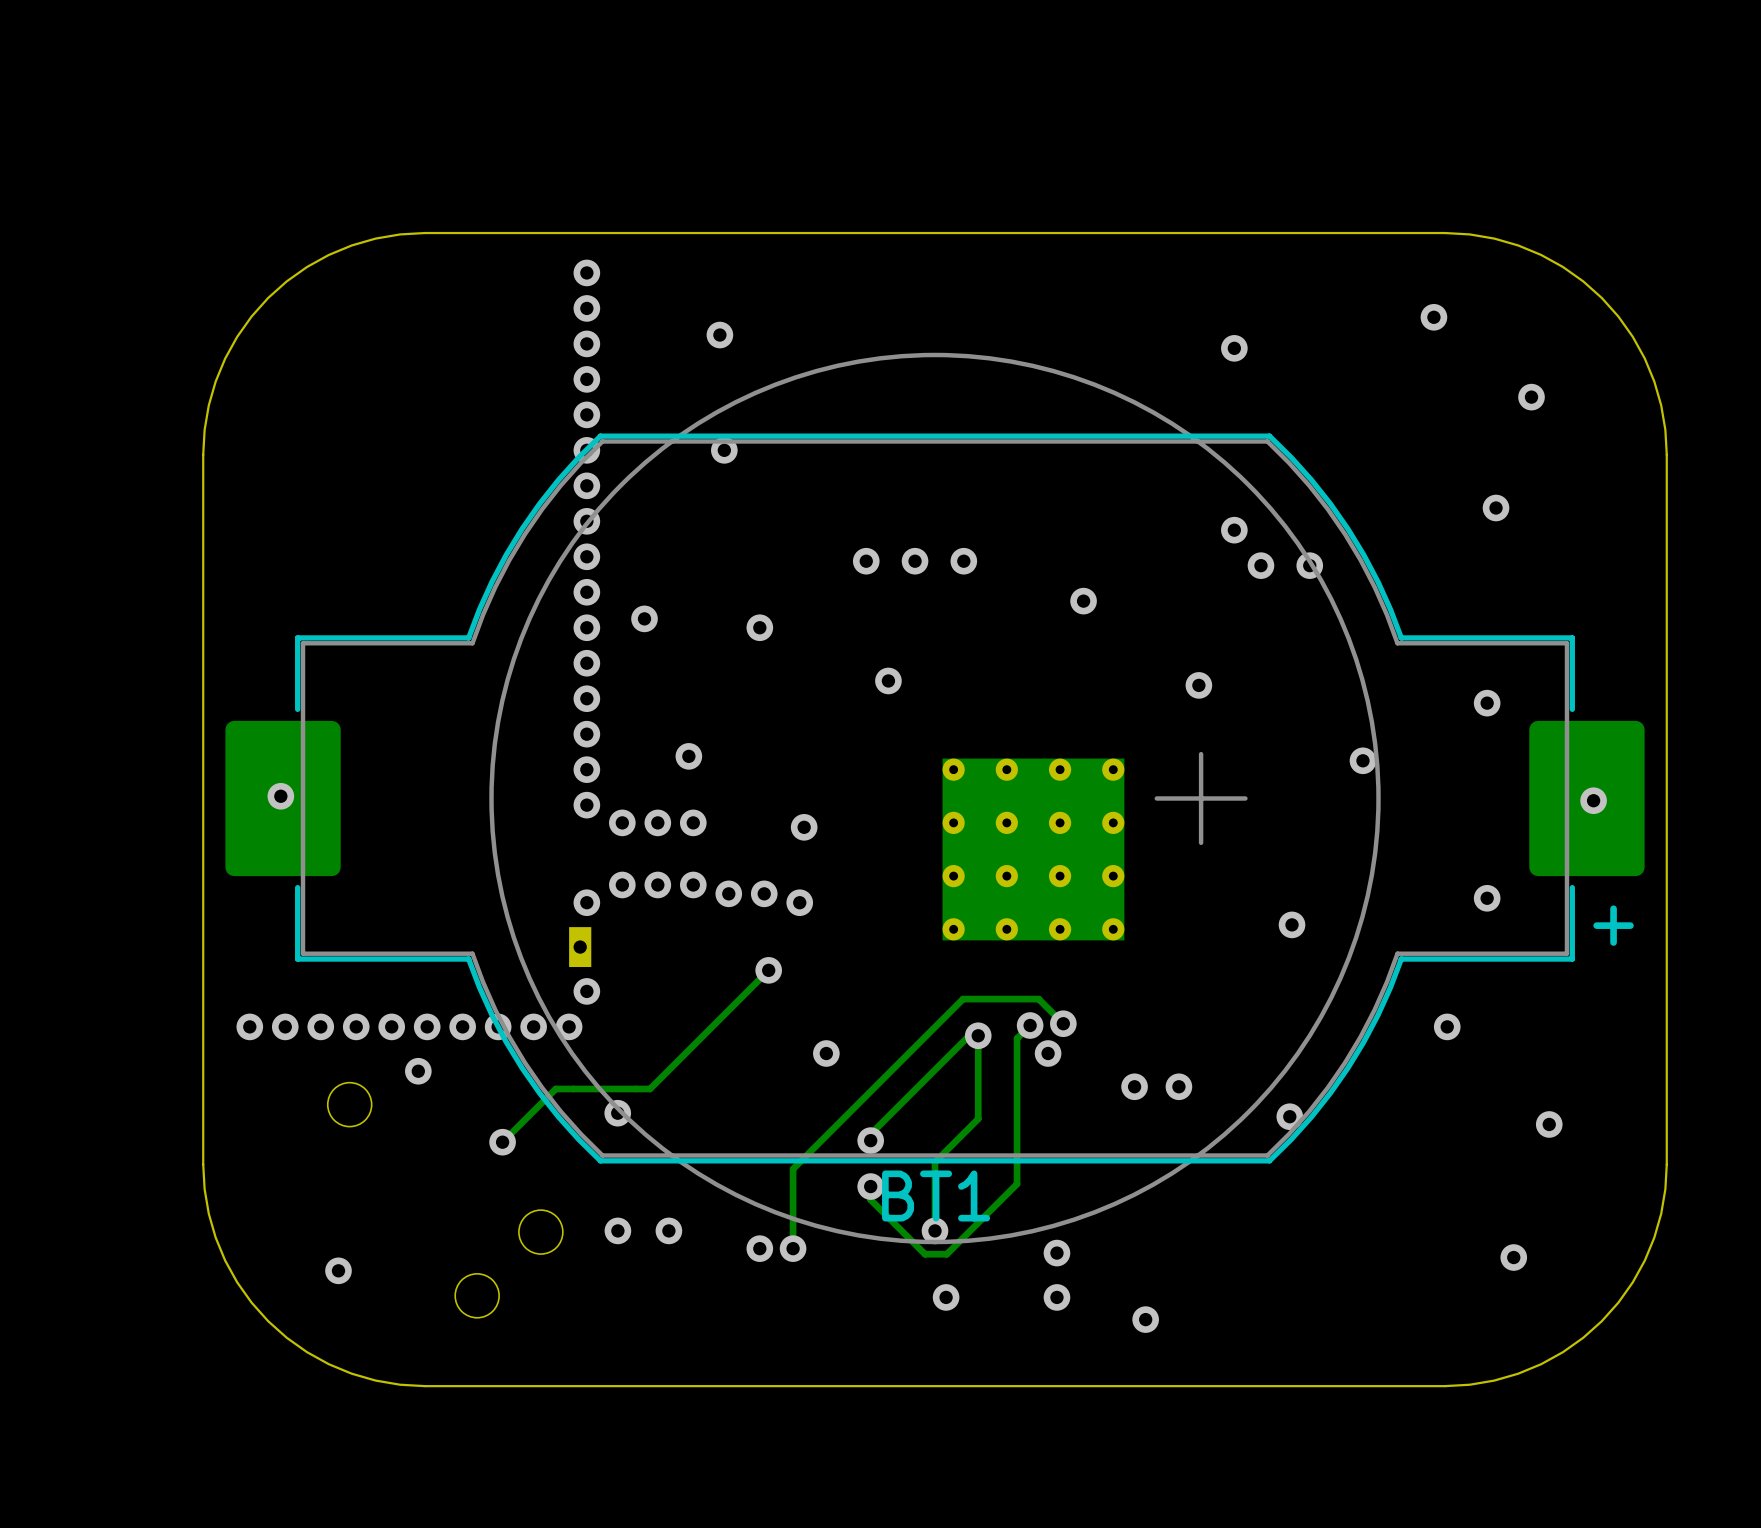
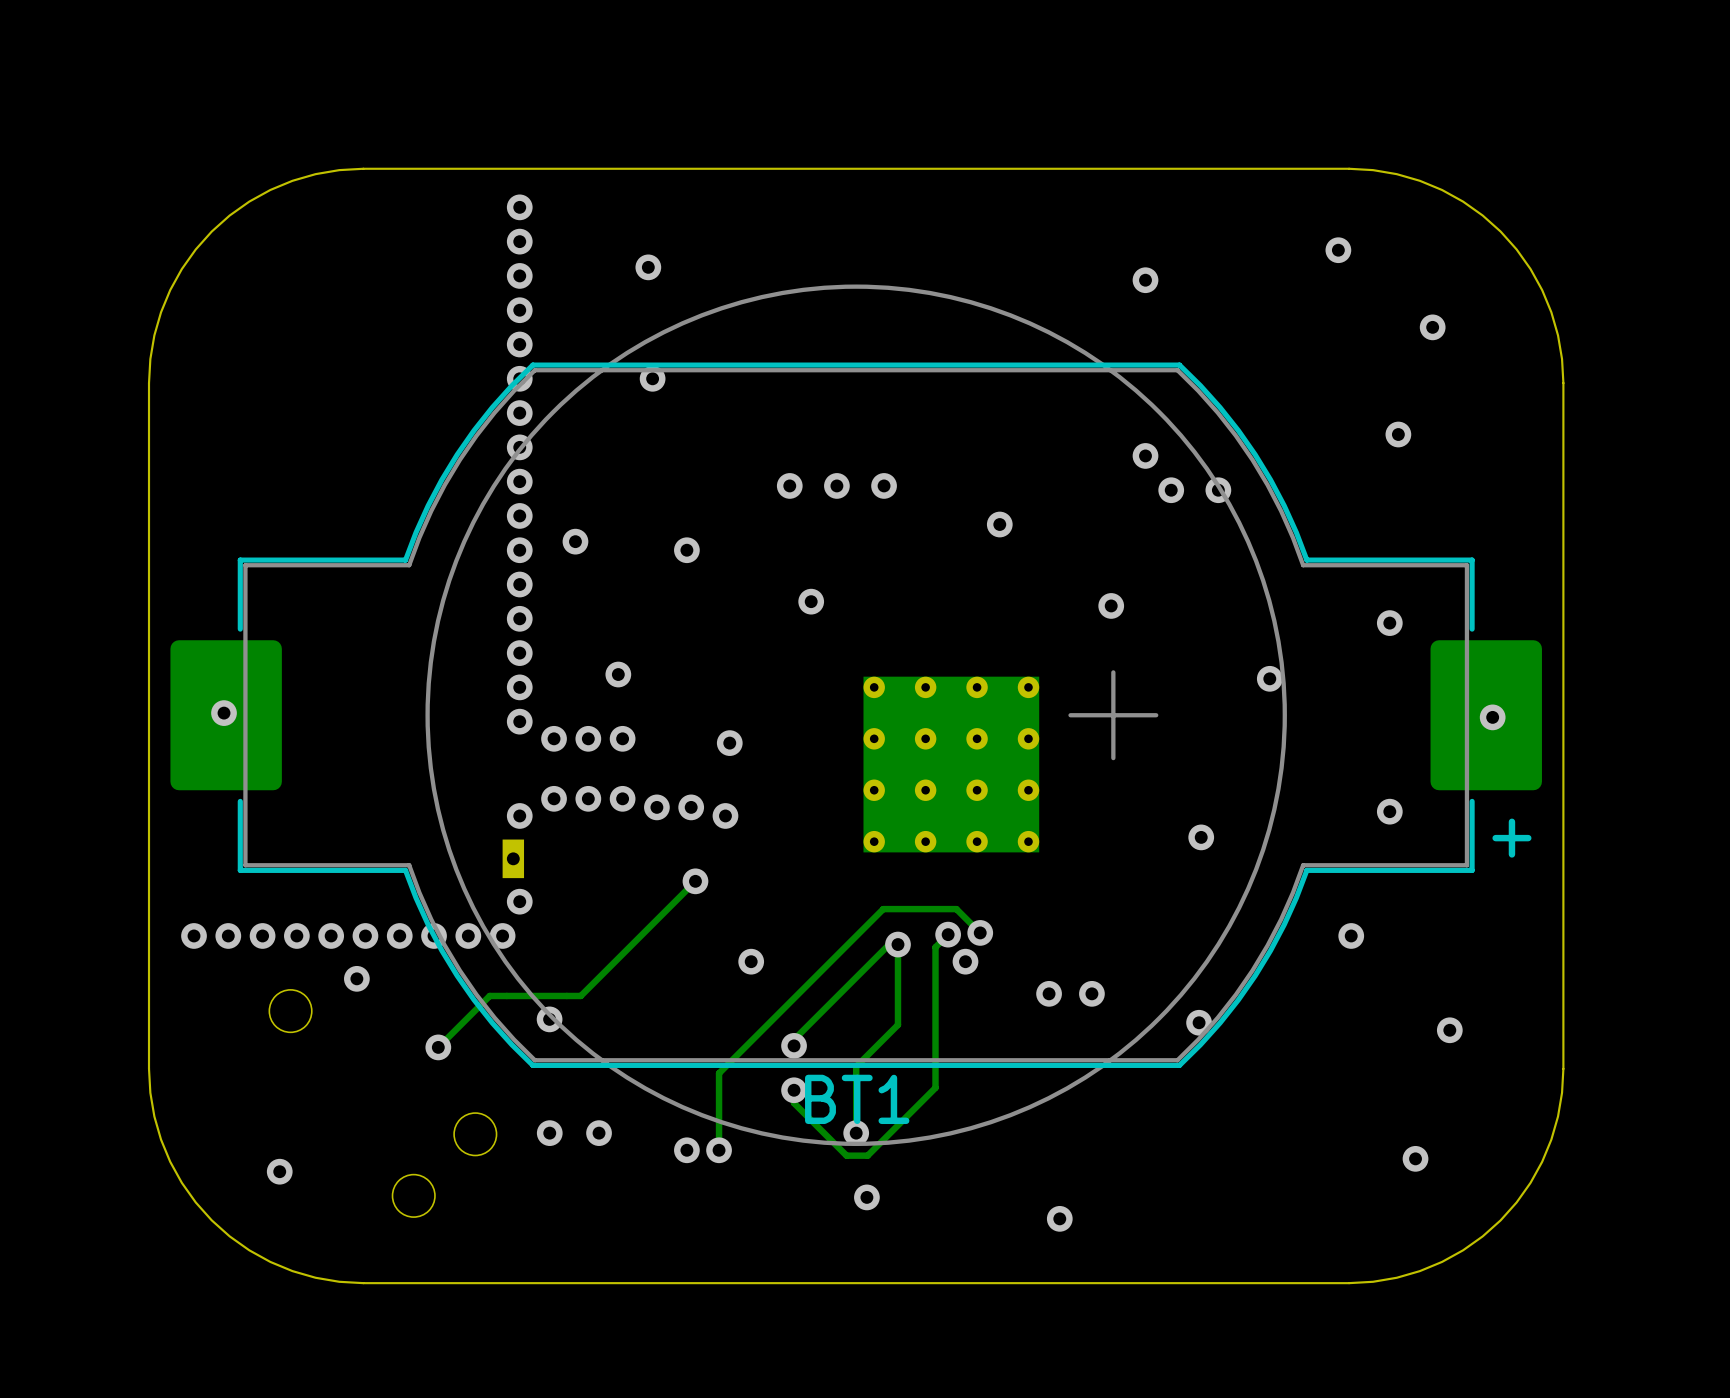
via: (1056, 1253) -> none
via: (1056, 1297) -> none

